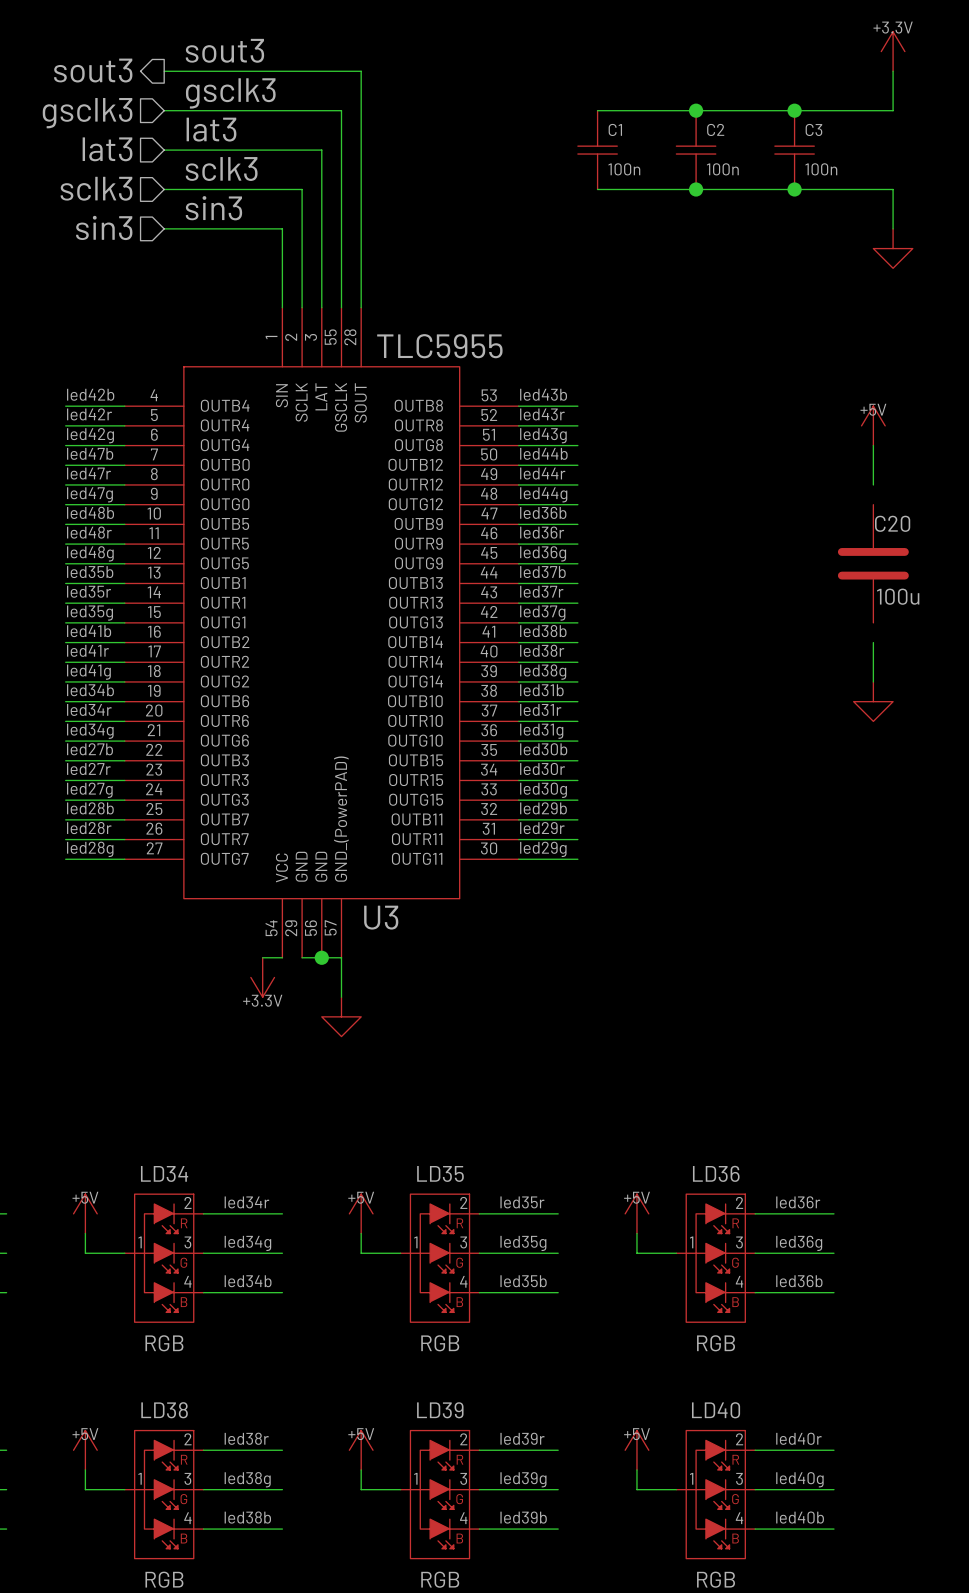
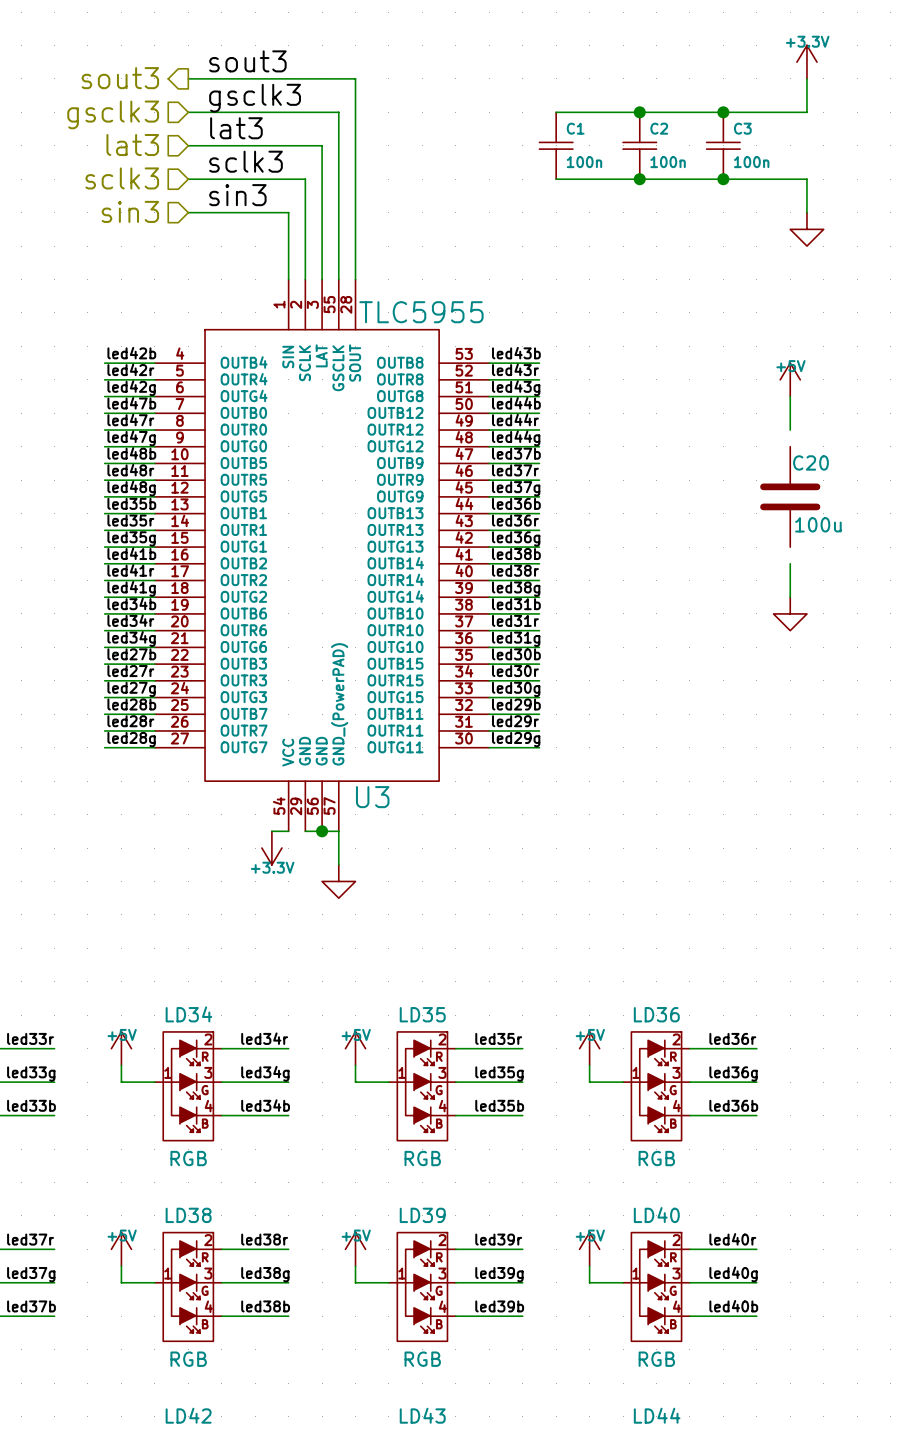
label: led36b (543, 512) -> led37b (516, 453)
label: led36r (542, 532) -> led37r (515, 470)
label: led36g (543, 553) -> led37g (516, 488)
label: led37b (542, 572) -> led36b (516, 503)
label: led37r (541, 591) -> led36r (515, 520)
label: led37g (542, 613) -> led36g (516, 538)

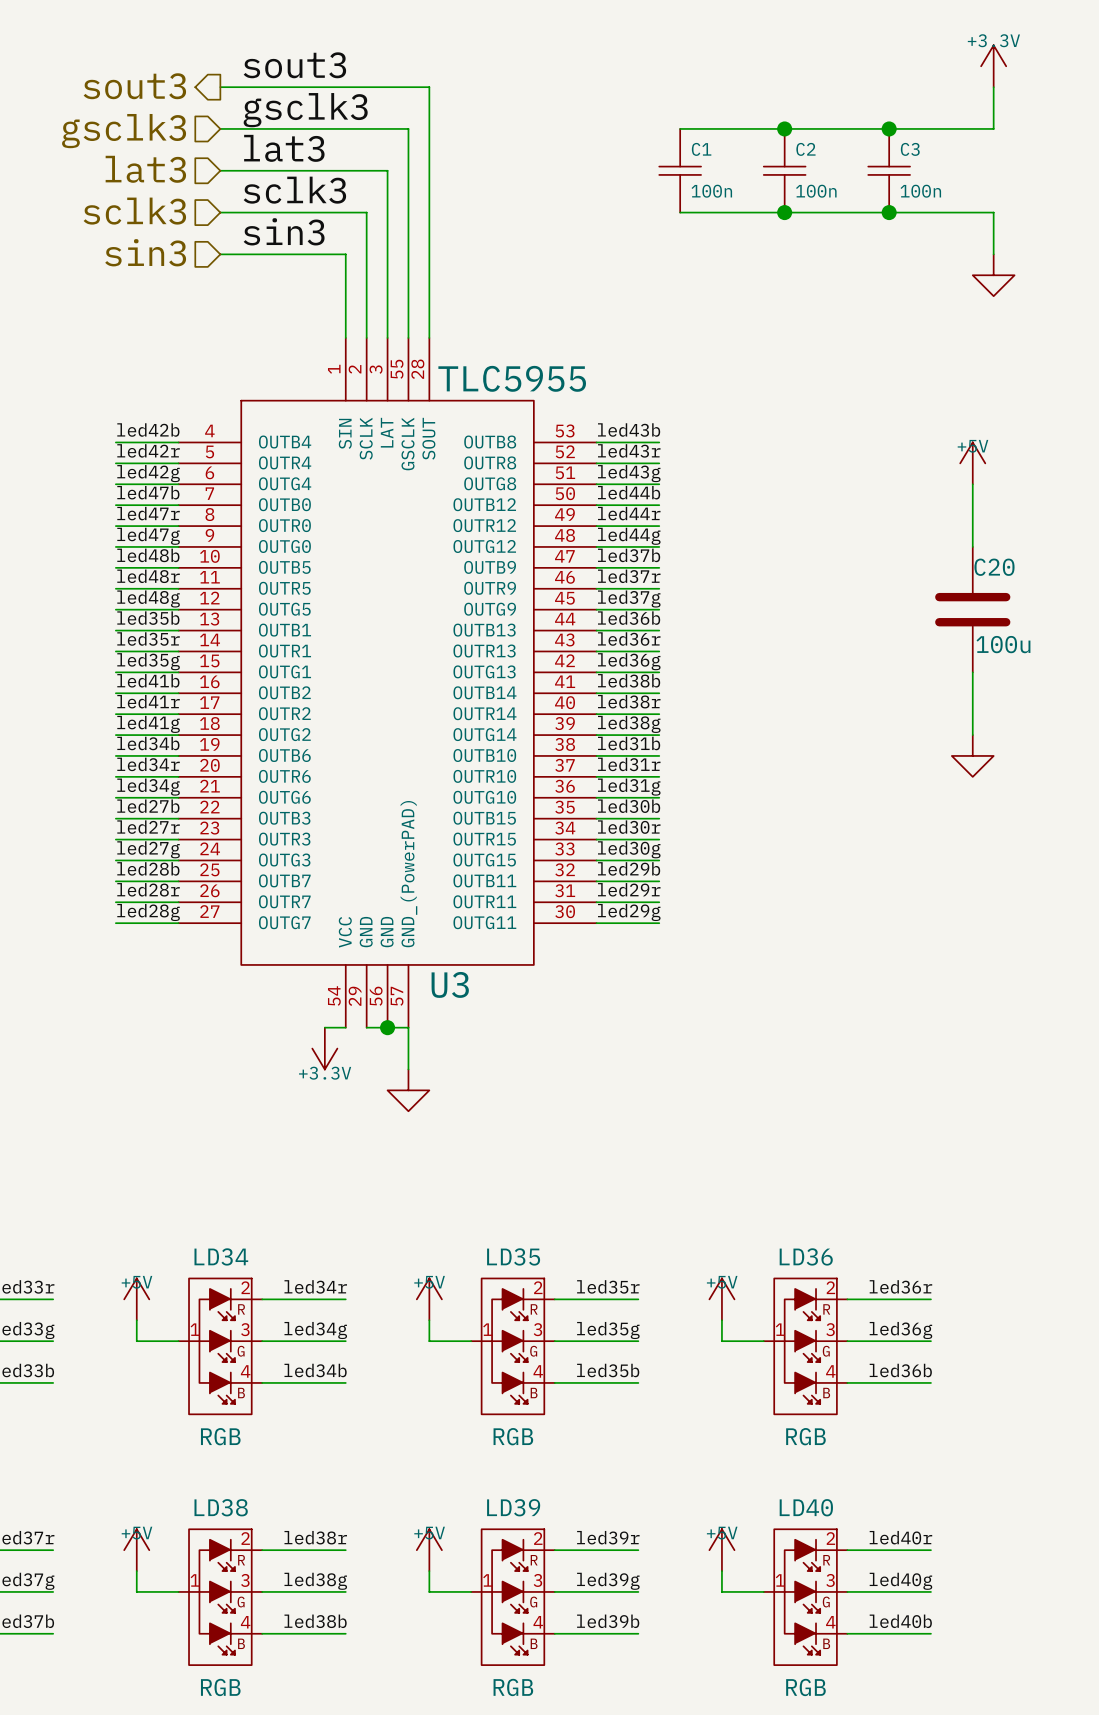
wire: none -> (972, 526) (972, 546)
wire: none -> (972, 672) (972, 693)

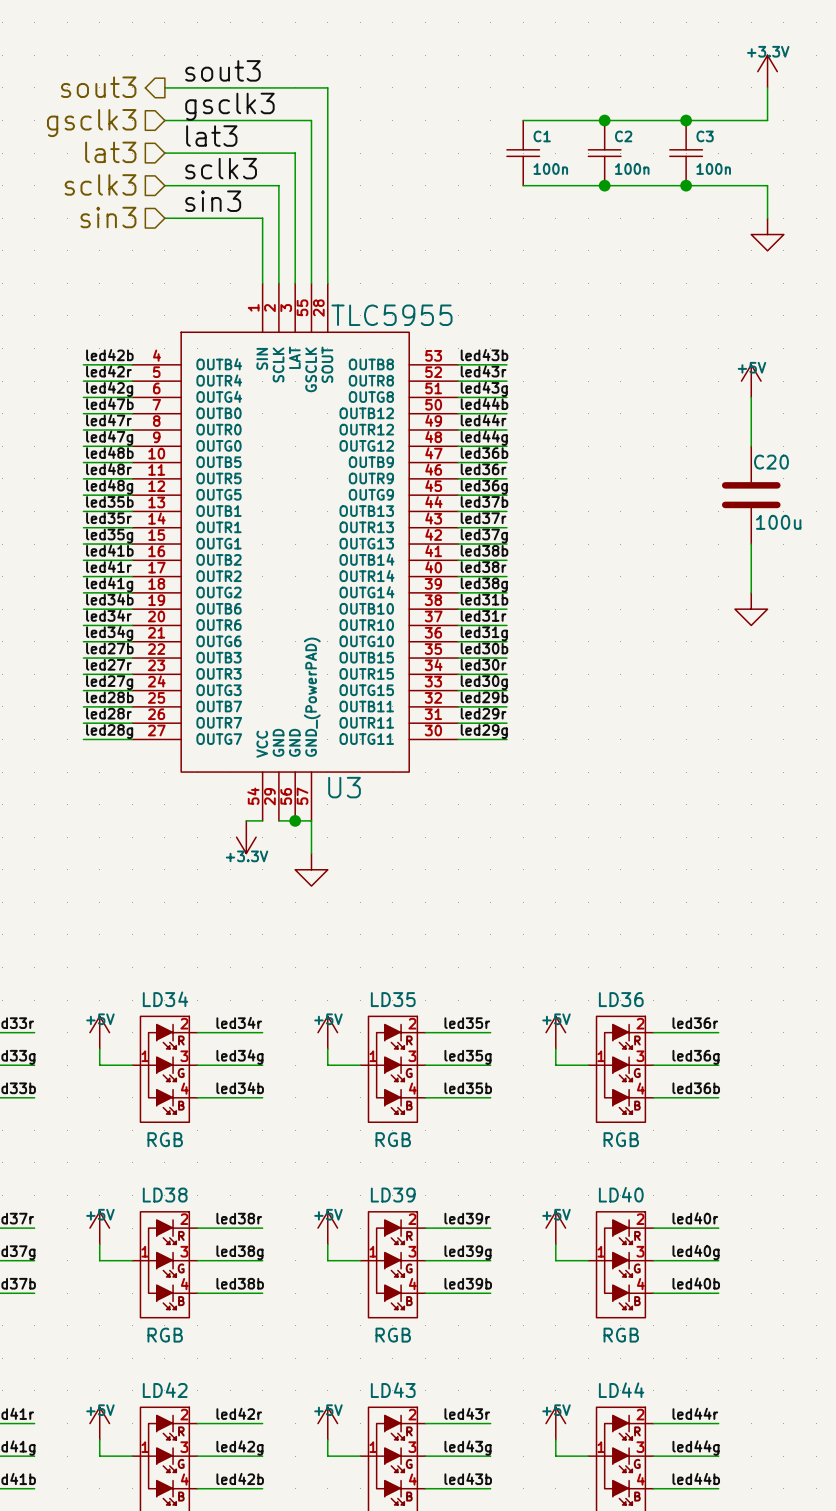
label: led37b (629, 555) -> led36b (484, 453)
label: led37r (629, 576) -> led36r (483, 469)
label: led37g (629, 599) -> led36g (484, 487)
label: led36b (629, 618) -> led37b (484, 501)
label: led36r (629, 639) -> led37r (483, 518)
label: led36g (629, 661) -> led37g (484, 536)

